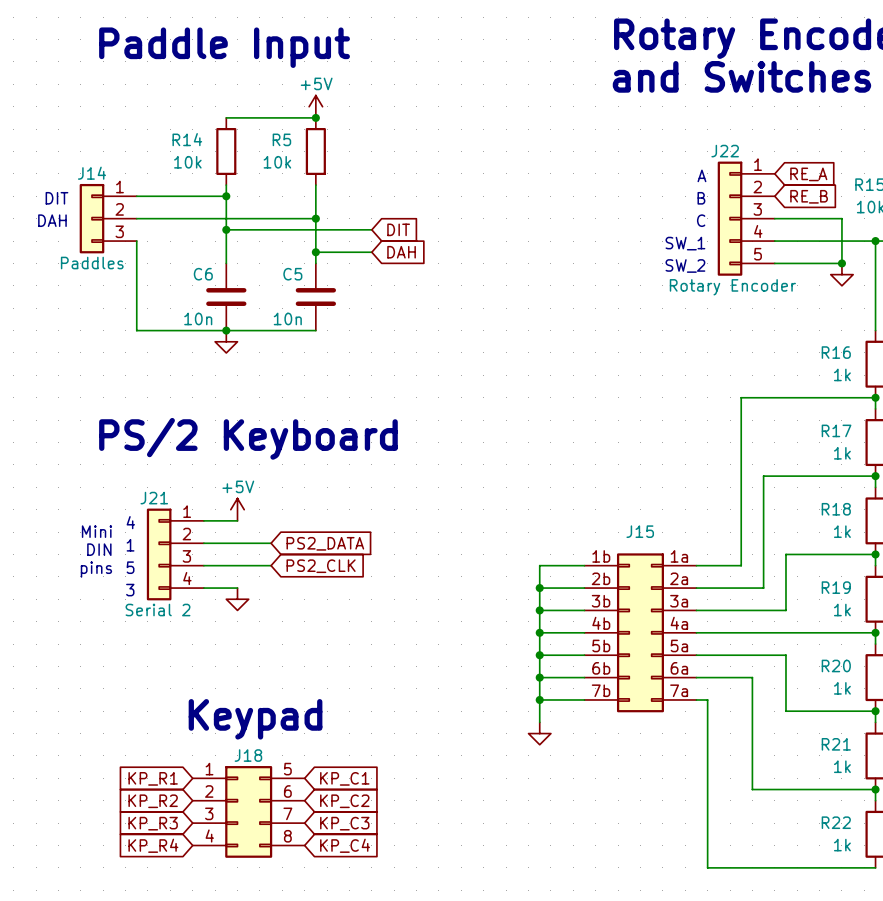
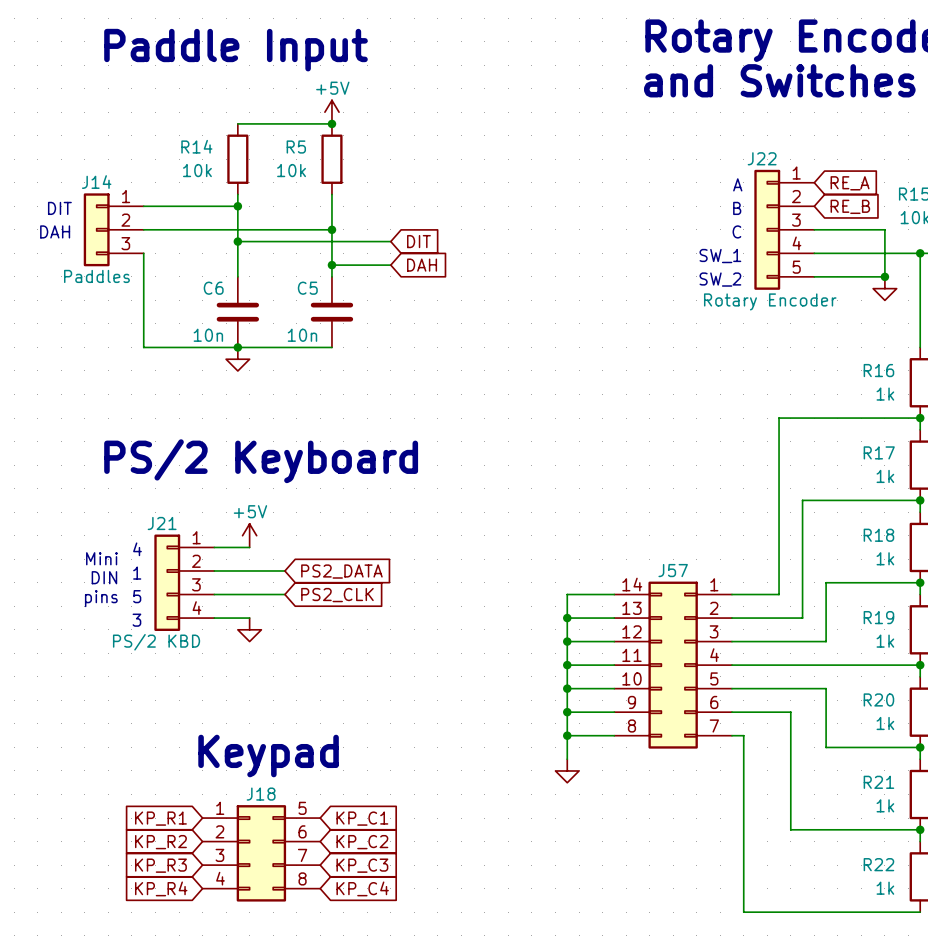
J15 name: J15 (640, 531) -> J57 (673, 570)
J15 symbol: [584, 553, 697, 713] -> [614, 581, 732, 749]
J21 value: Serial 2 (158, 610) -> PS/2 KBD (156, 642)

